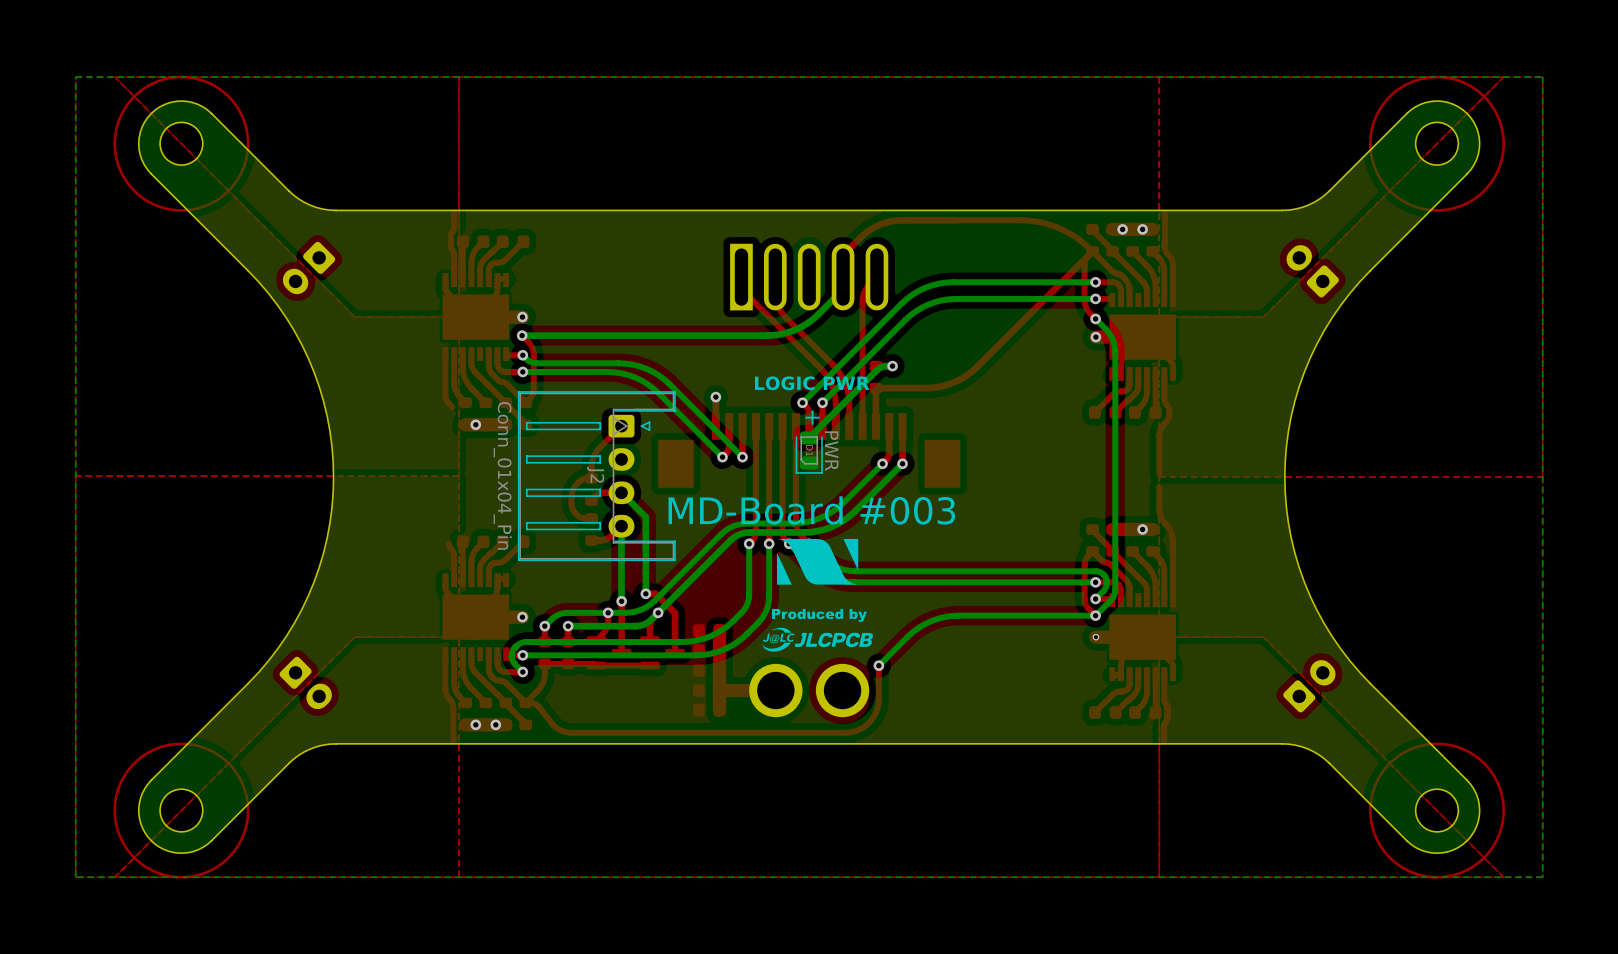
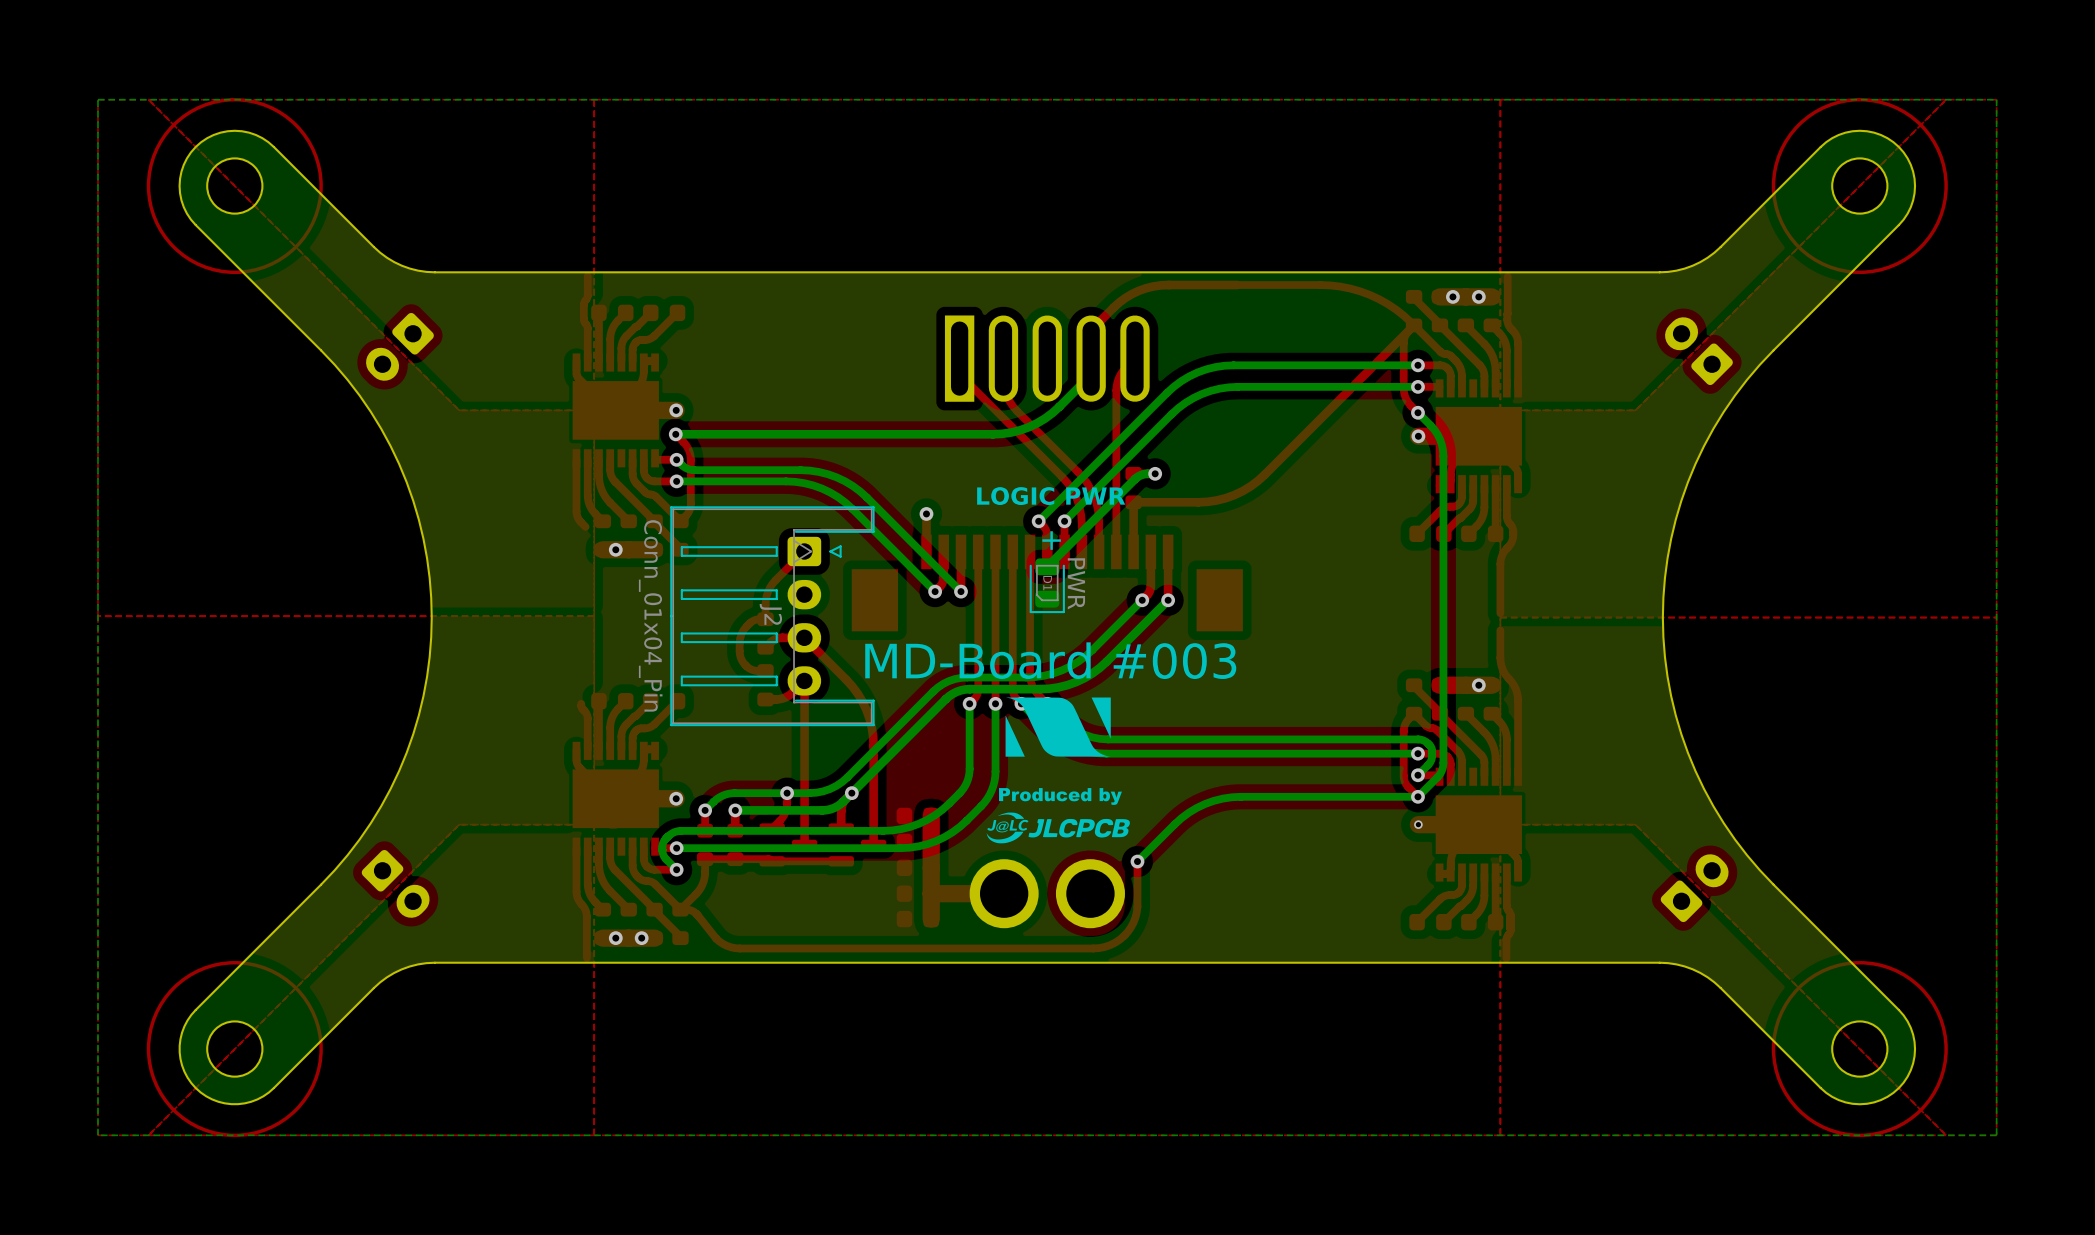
bottom track: (621, 492) (645, 517) (645, 593) -> none
top track: none -> (804, 681) (804, 778)
bottom track: (621, 526) (621, 601) -> none
top track: (645, 593) (655, 593) (675, 612) -> (804, 637) (852, 686) (866, 710) (873, 736) (873, 793)
via: (645, 593) -> none
via: (621, 601) -> none

